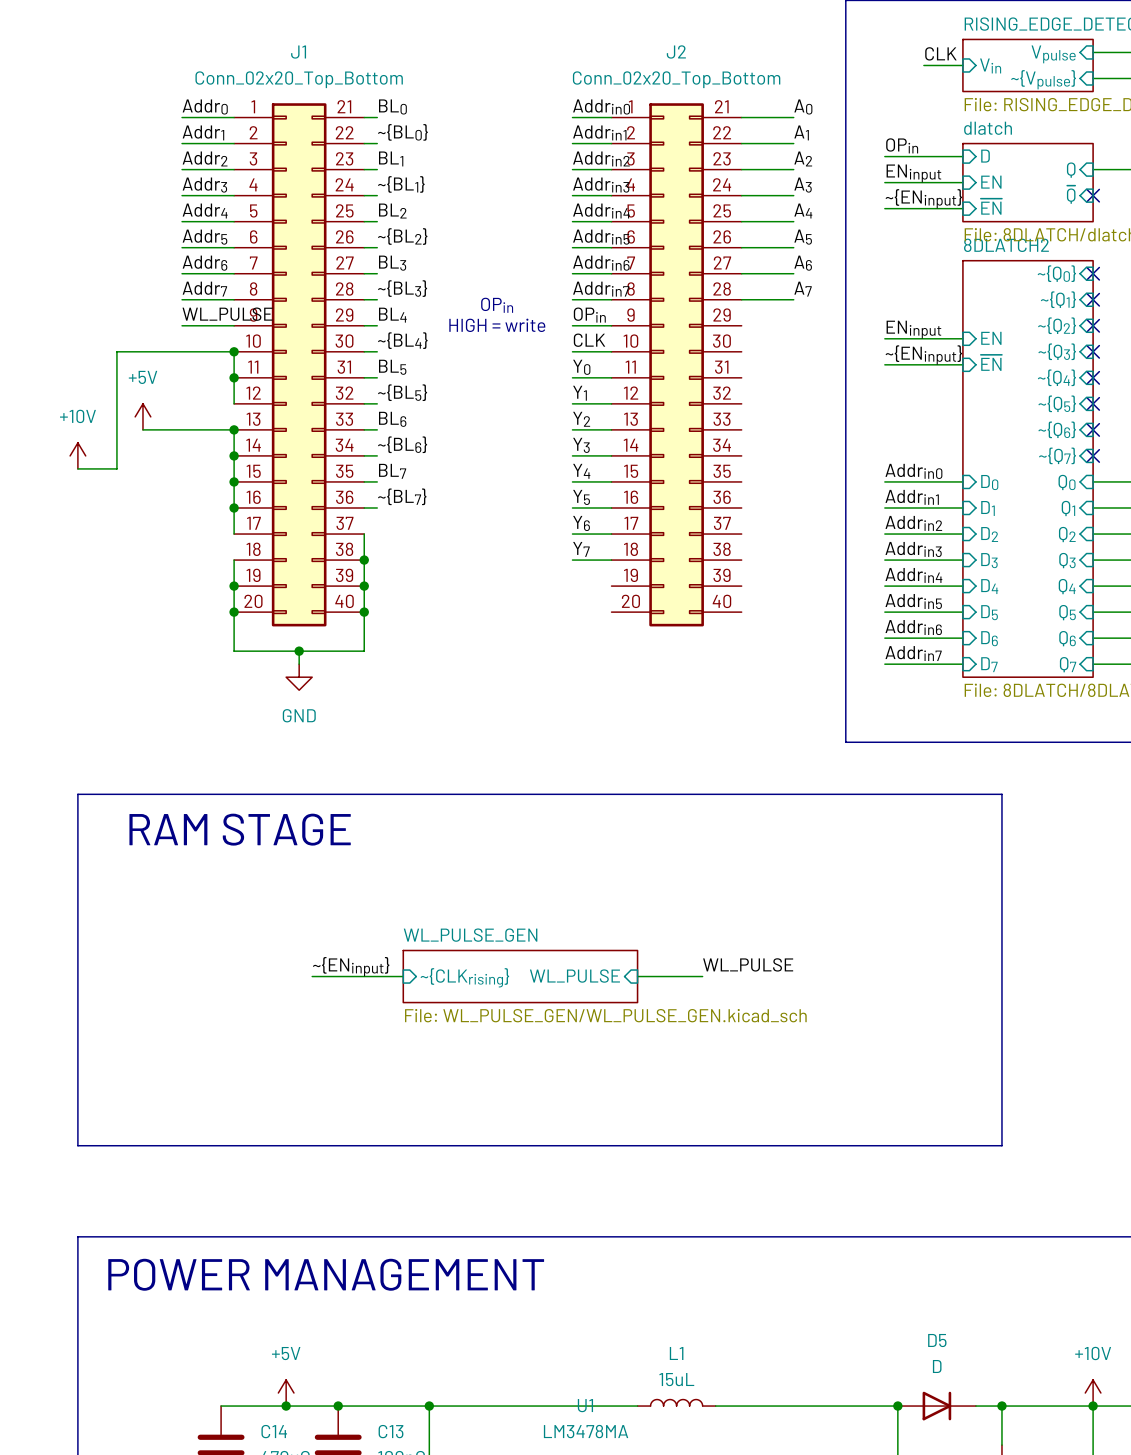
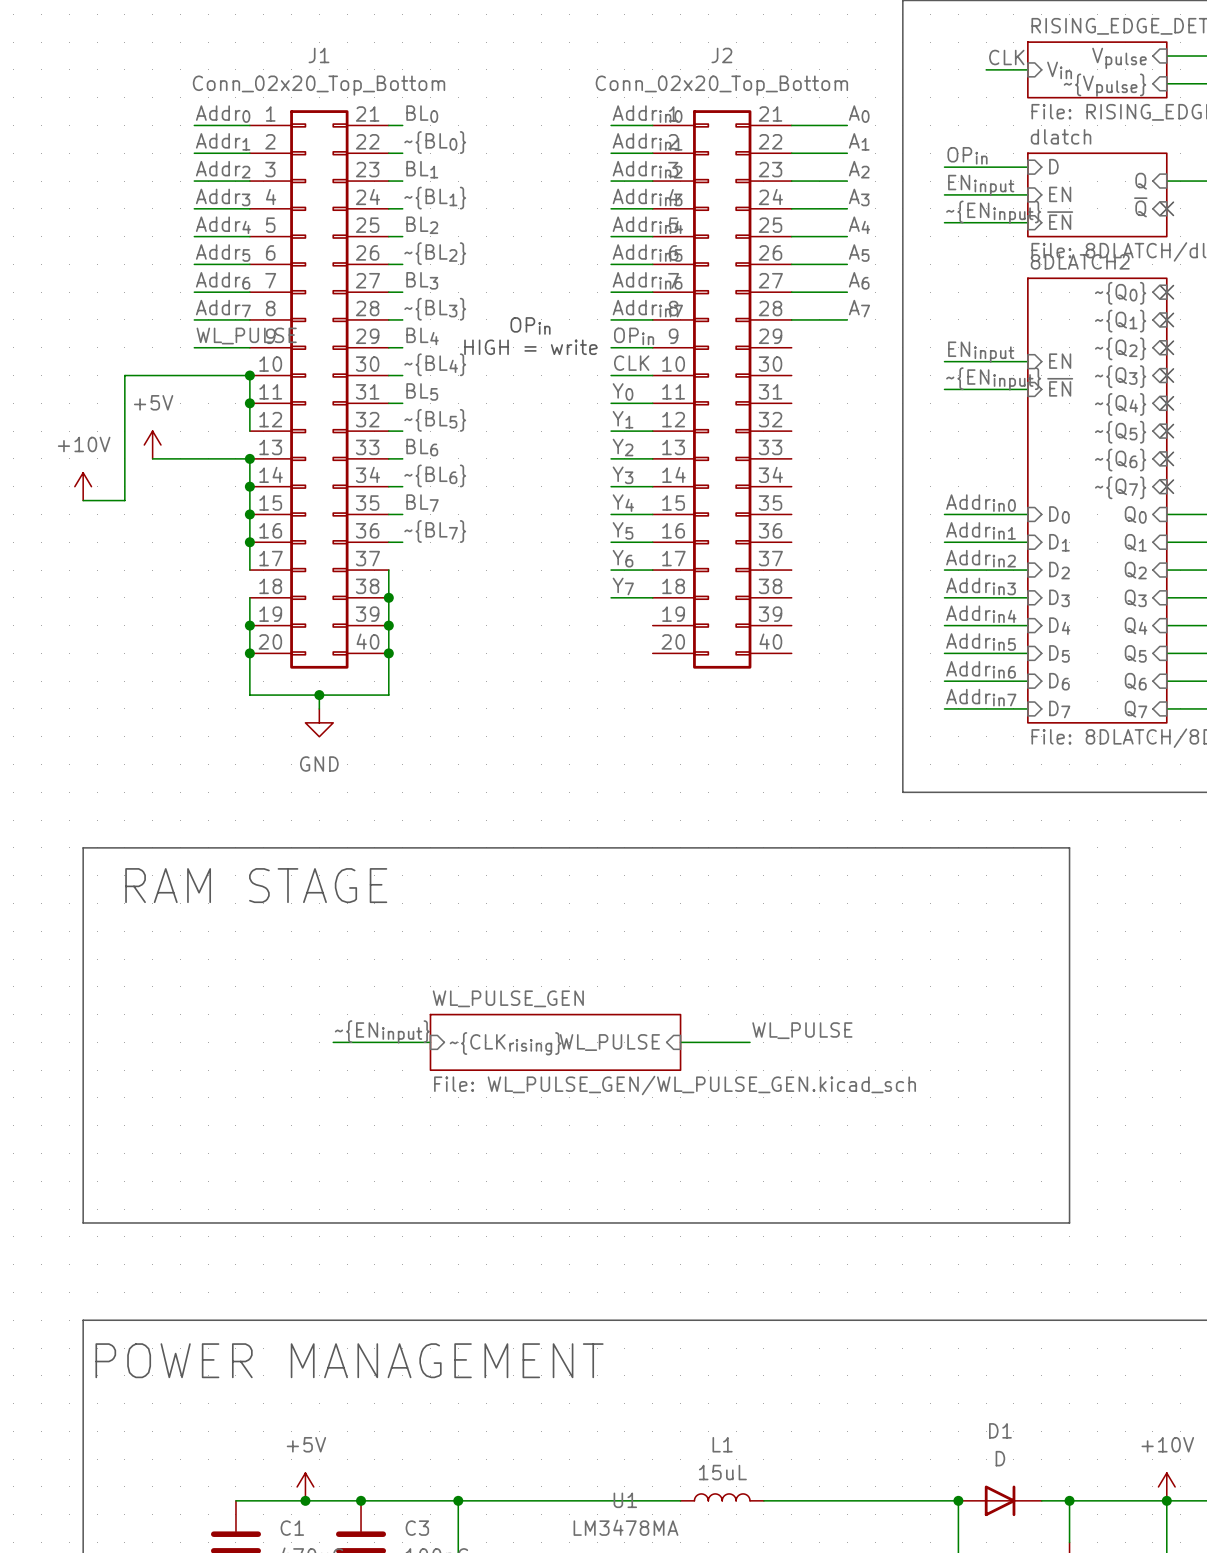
D5 name: D5 (937, 1340) -> D1 (1000, 1430)
C14 name: C14 (274, 1431) -> C1 (292, 1528)
C13 name: C13 (391, 1431) -> C3 (417, 1528)

